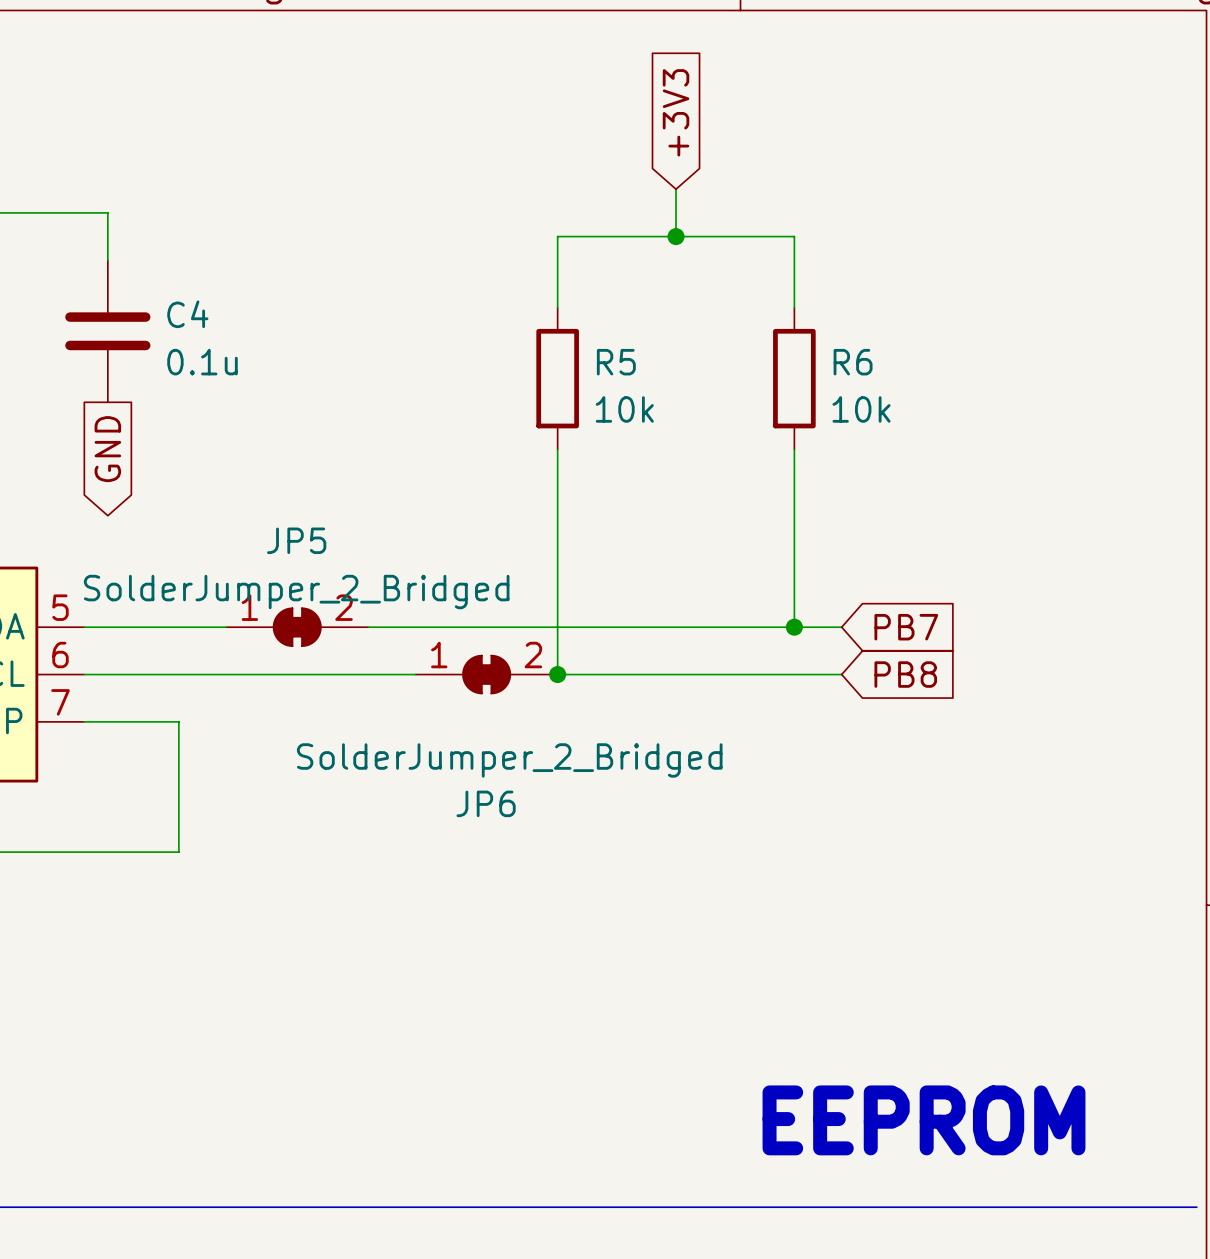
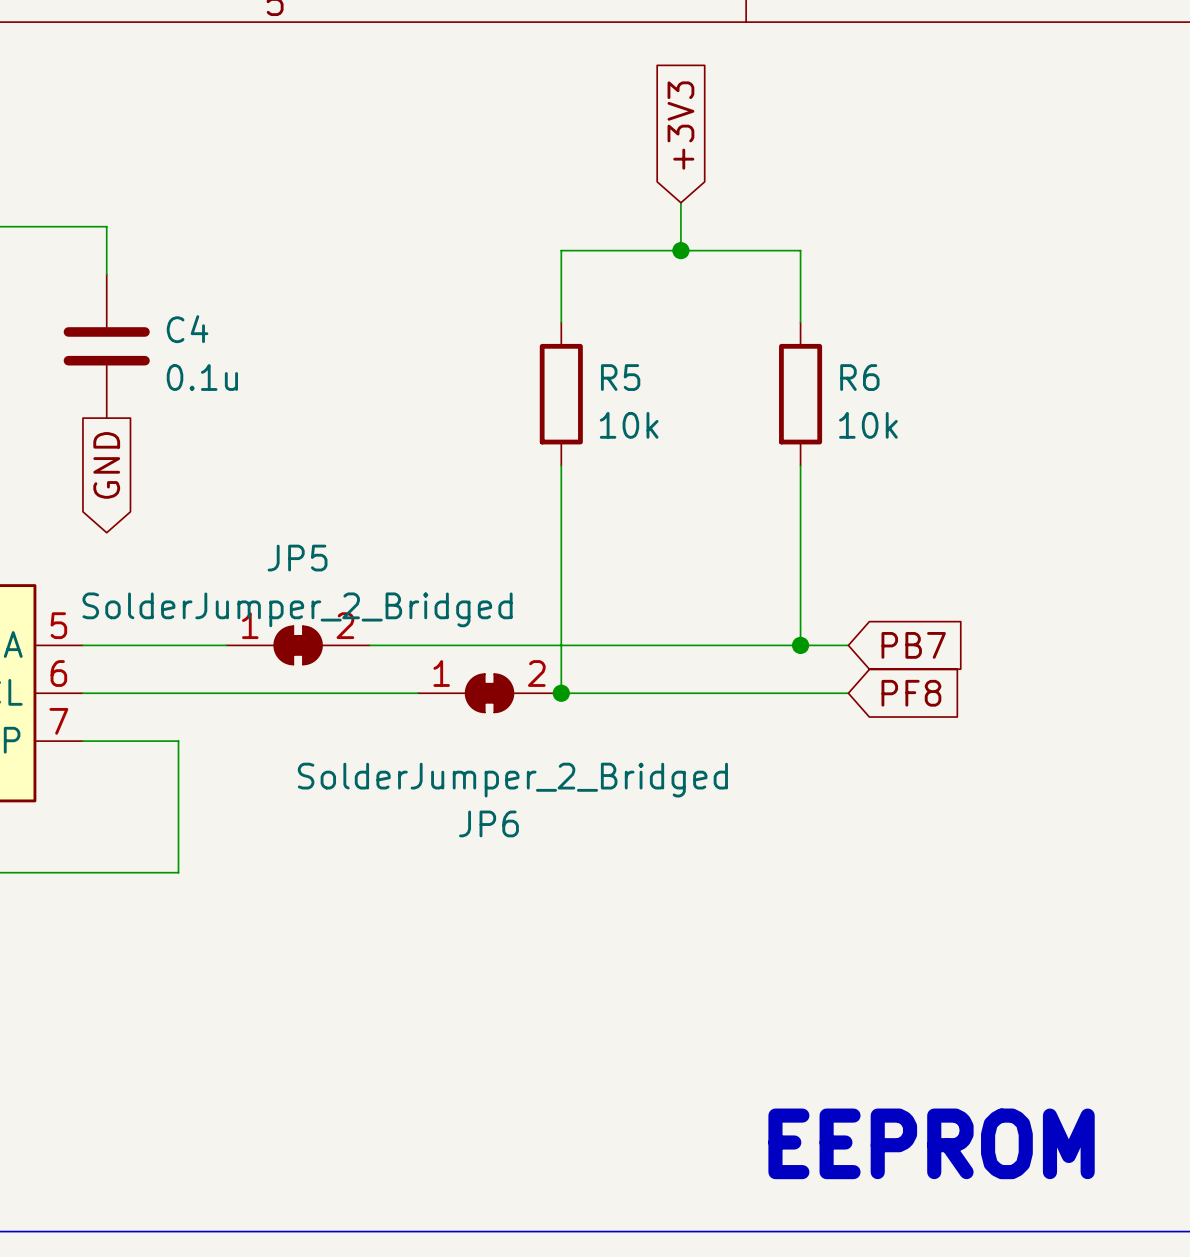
global label: PB8 (905, 674) -> PF8 (911, 693)

